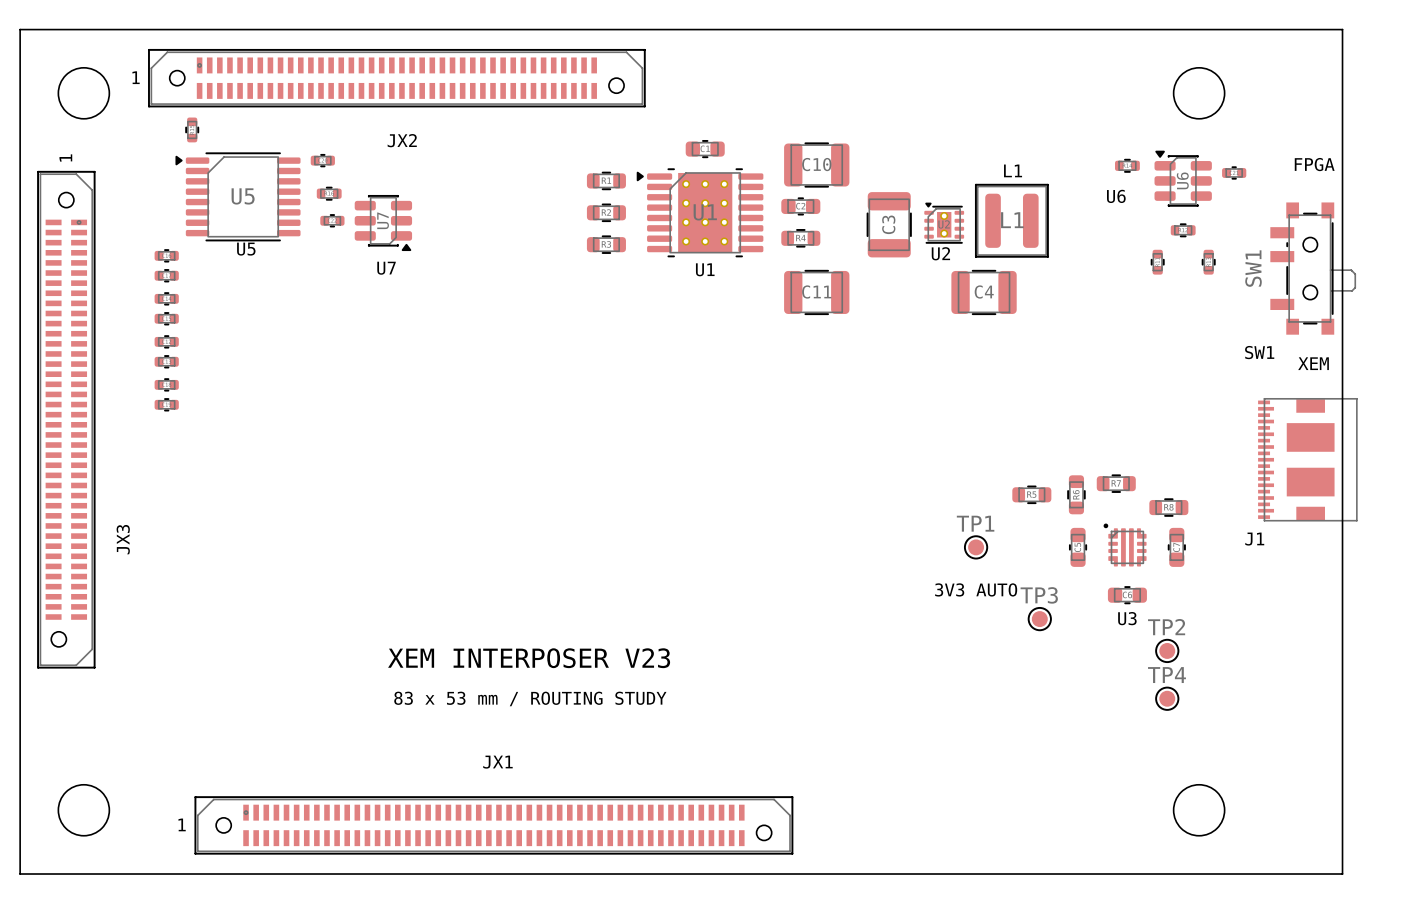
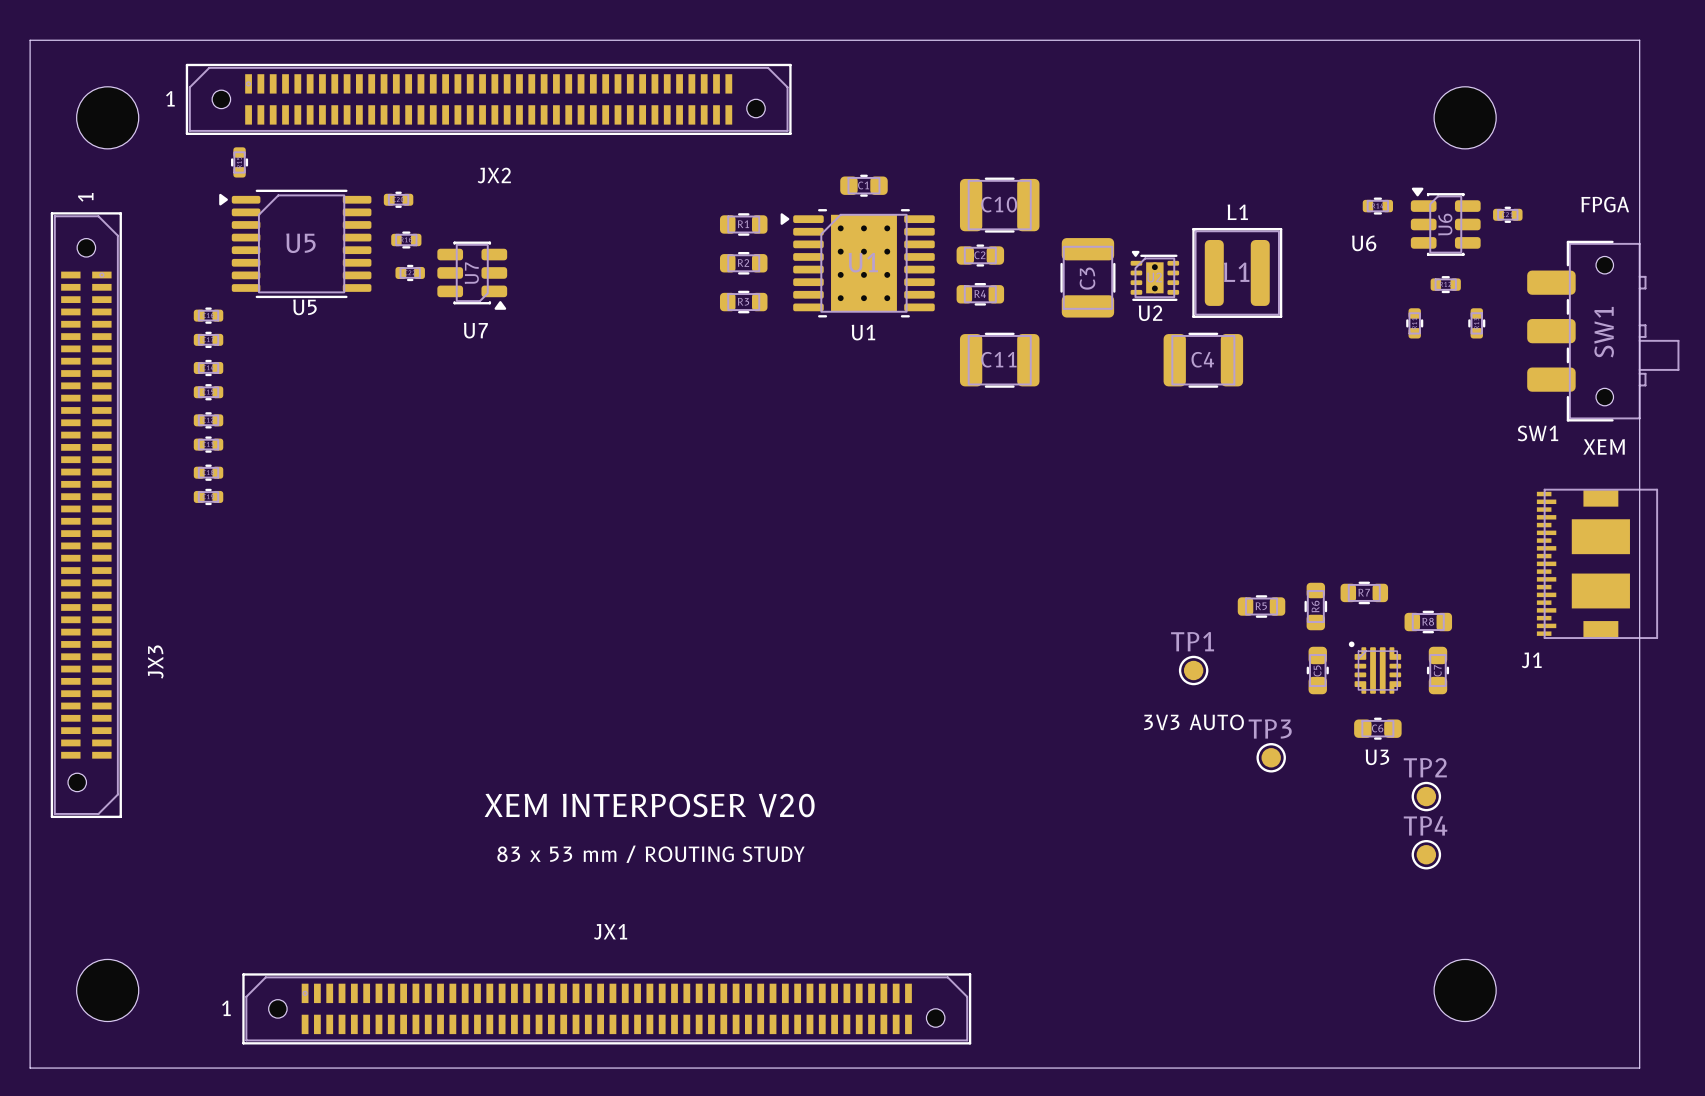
SW1 footprint: [1270, 202, 1357, 335] -> [1527, 240, 1680, 422]
SW1 name position: SW1 (1253, 268) -> SW1 (1604, 332)
text: XEM INTERPOSER V23 (529, 658) -> XEM INTERPOSER V20 (649, 805)

